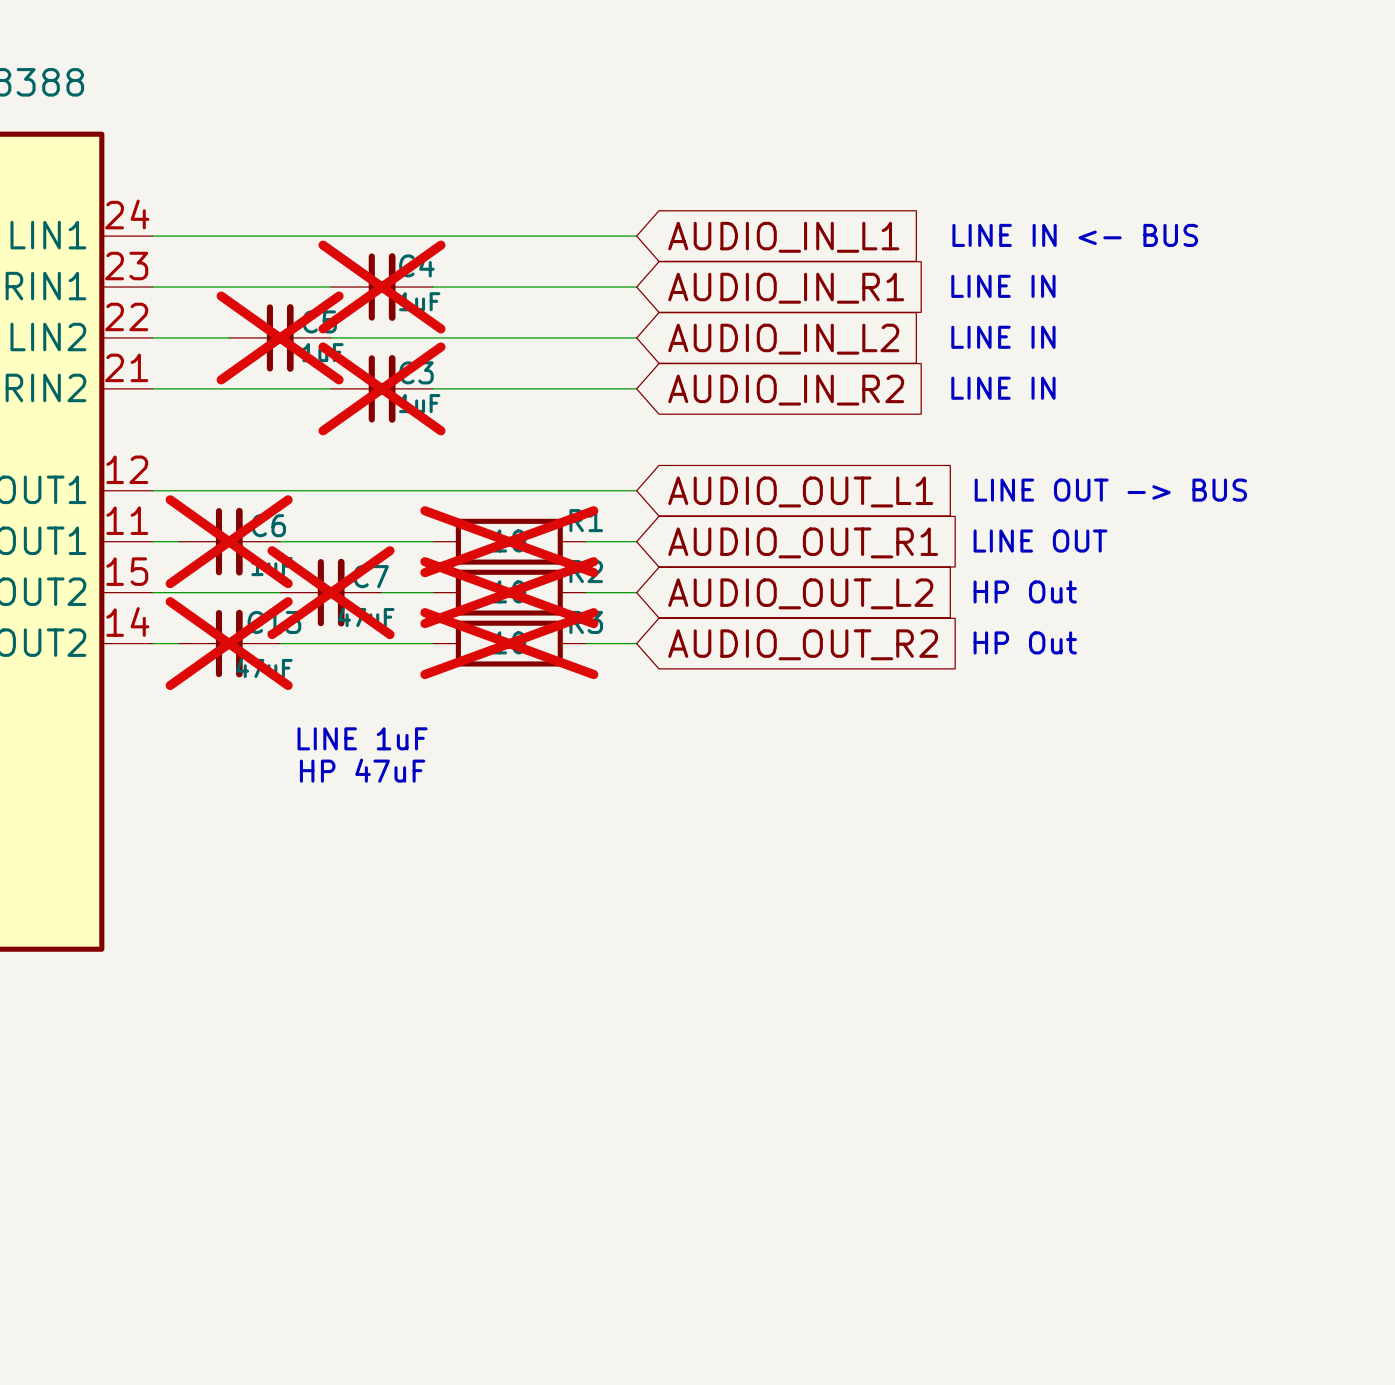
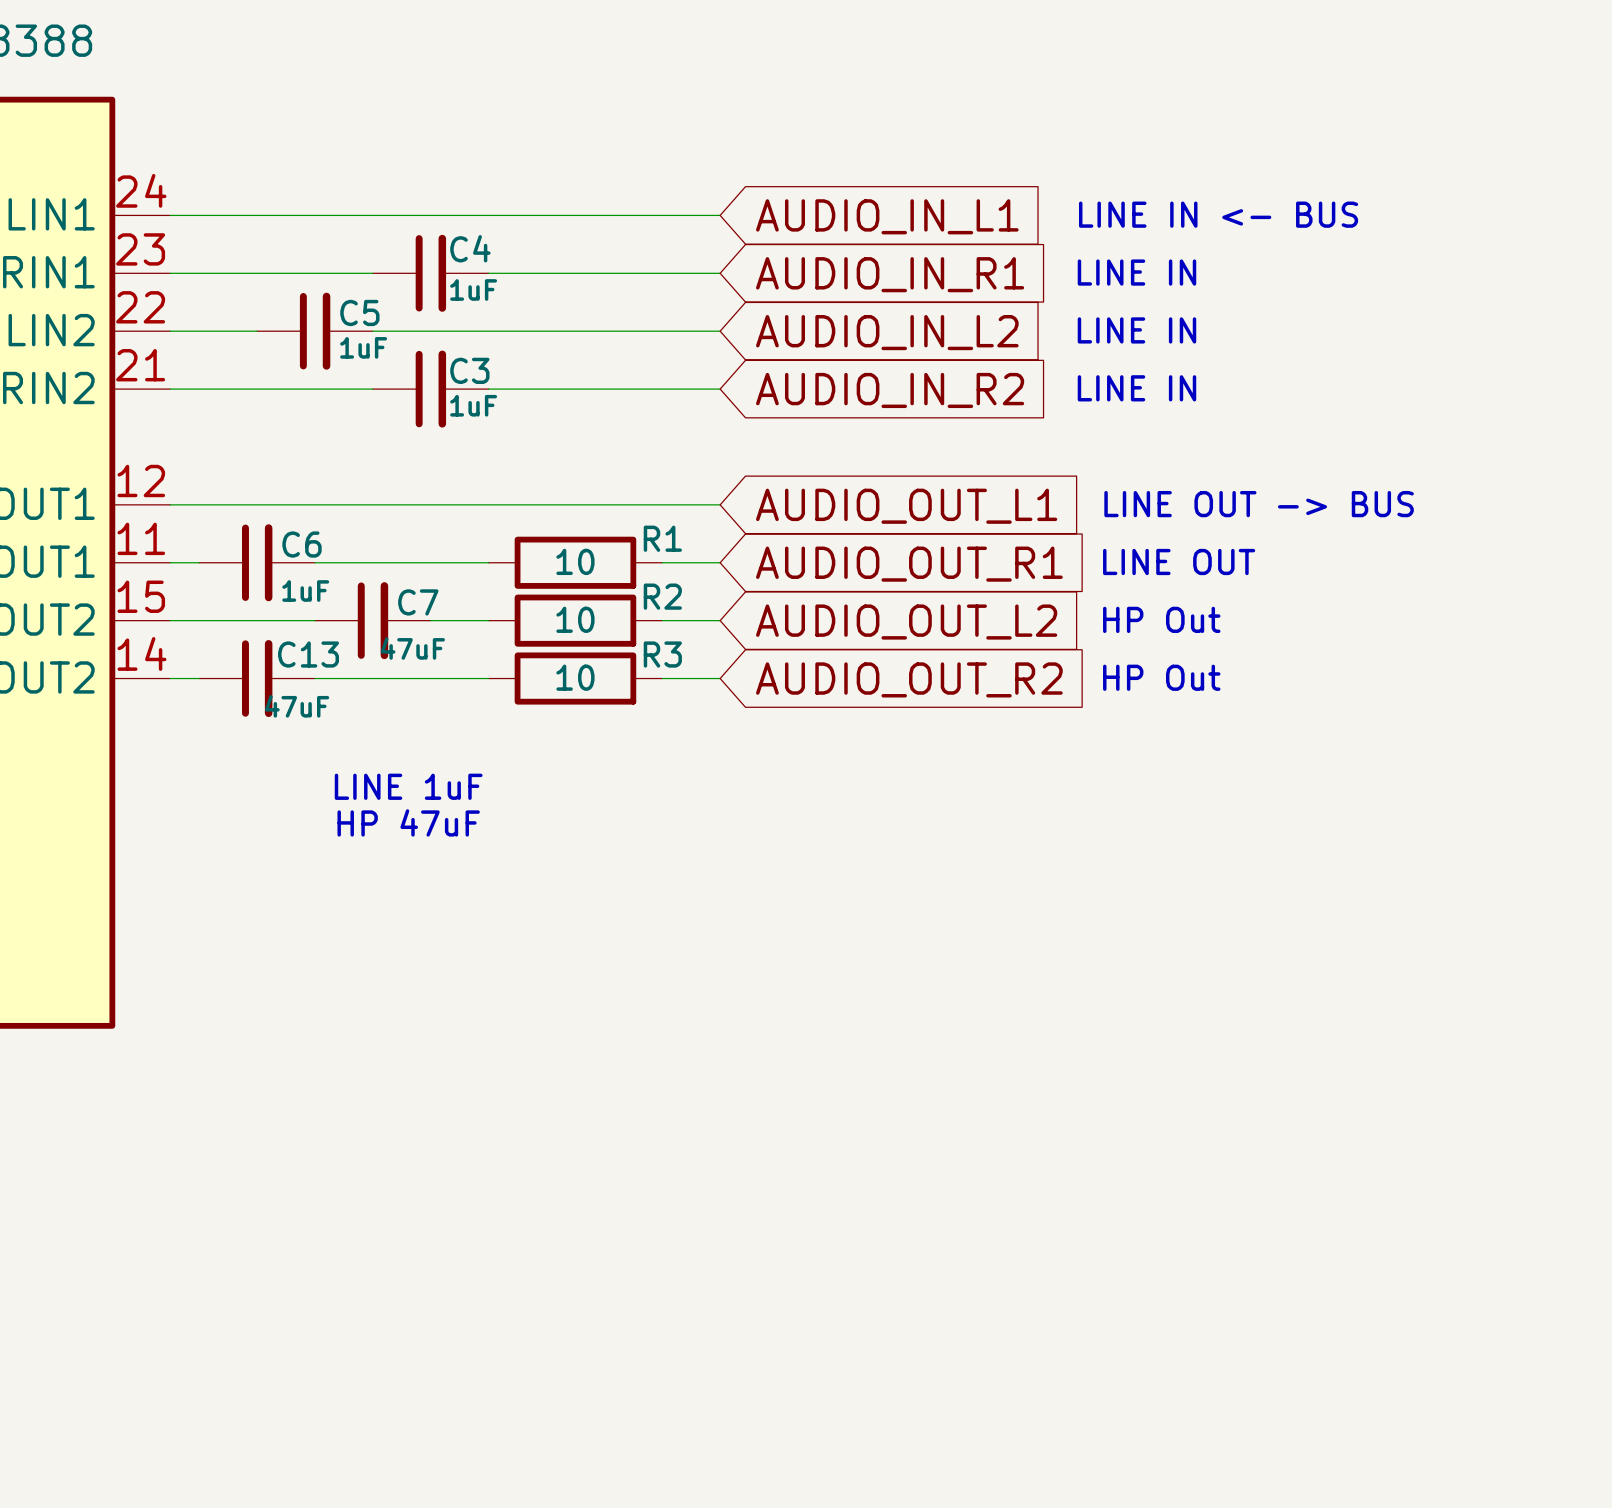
C4 do-not-place cross: (381, 287) -> none
C5 do-not-place cross: (280, 337) -> none
C3 do-not-place cross: (381, 388) -> none
C6 do-not-place cross: (229, 541) -> none
R1 do-not-place cross: (509, 541) -> none
C7 do-not-place cross: (331, 592) -> none
R2 do-not-place cross: (509, 592) -> none
C13 do-not-place cross: (229, 643) -> none
R3 do-not-place cross: (509, 643) -> none

